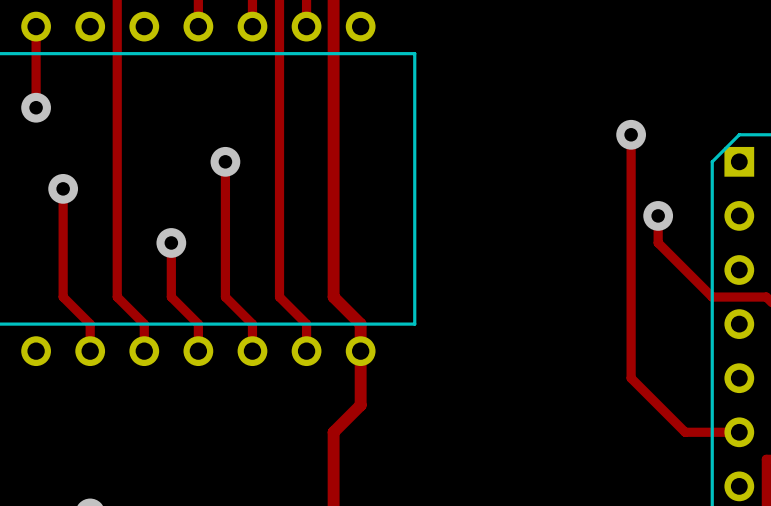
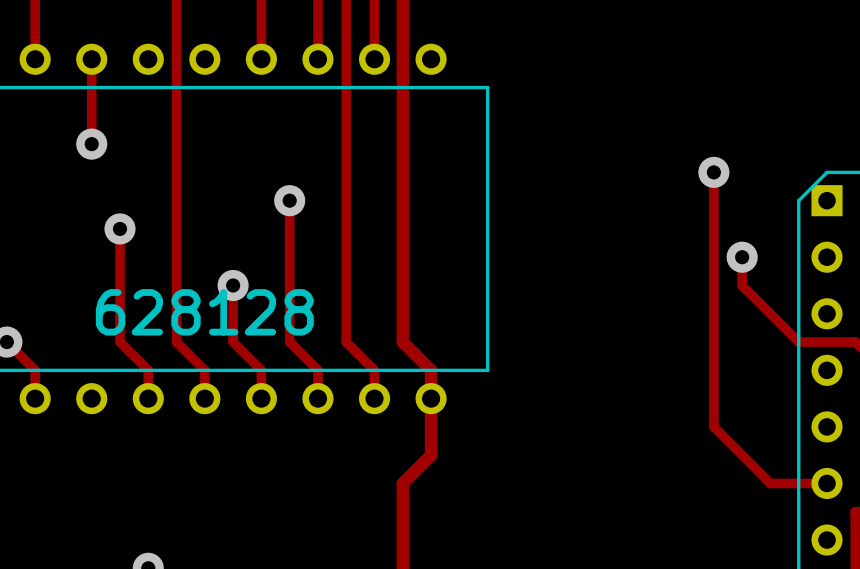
part value: none -> 628128 (204, 312)

